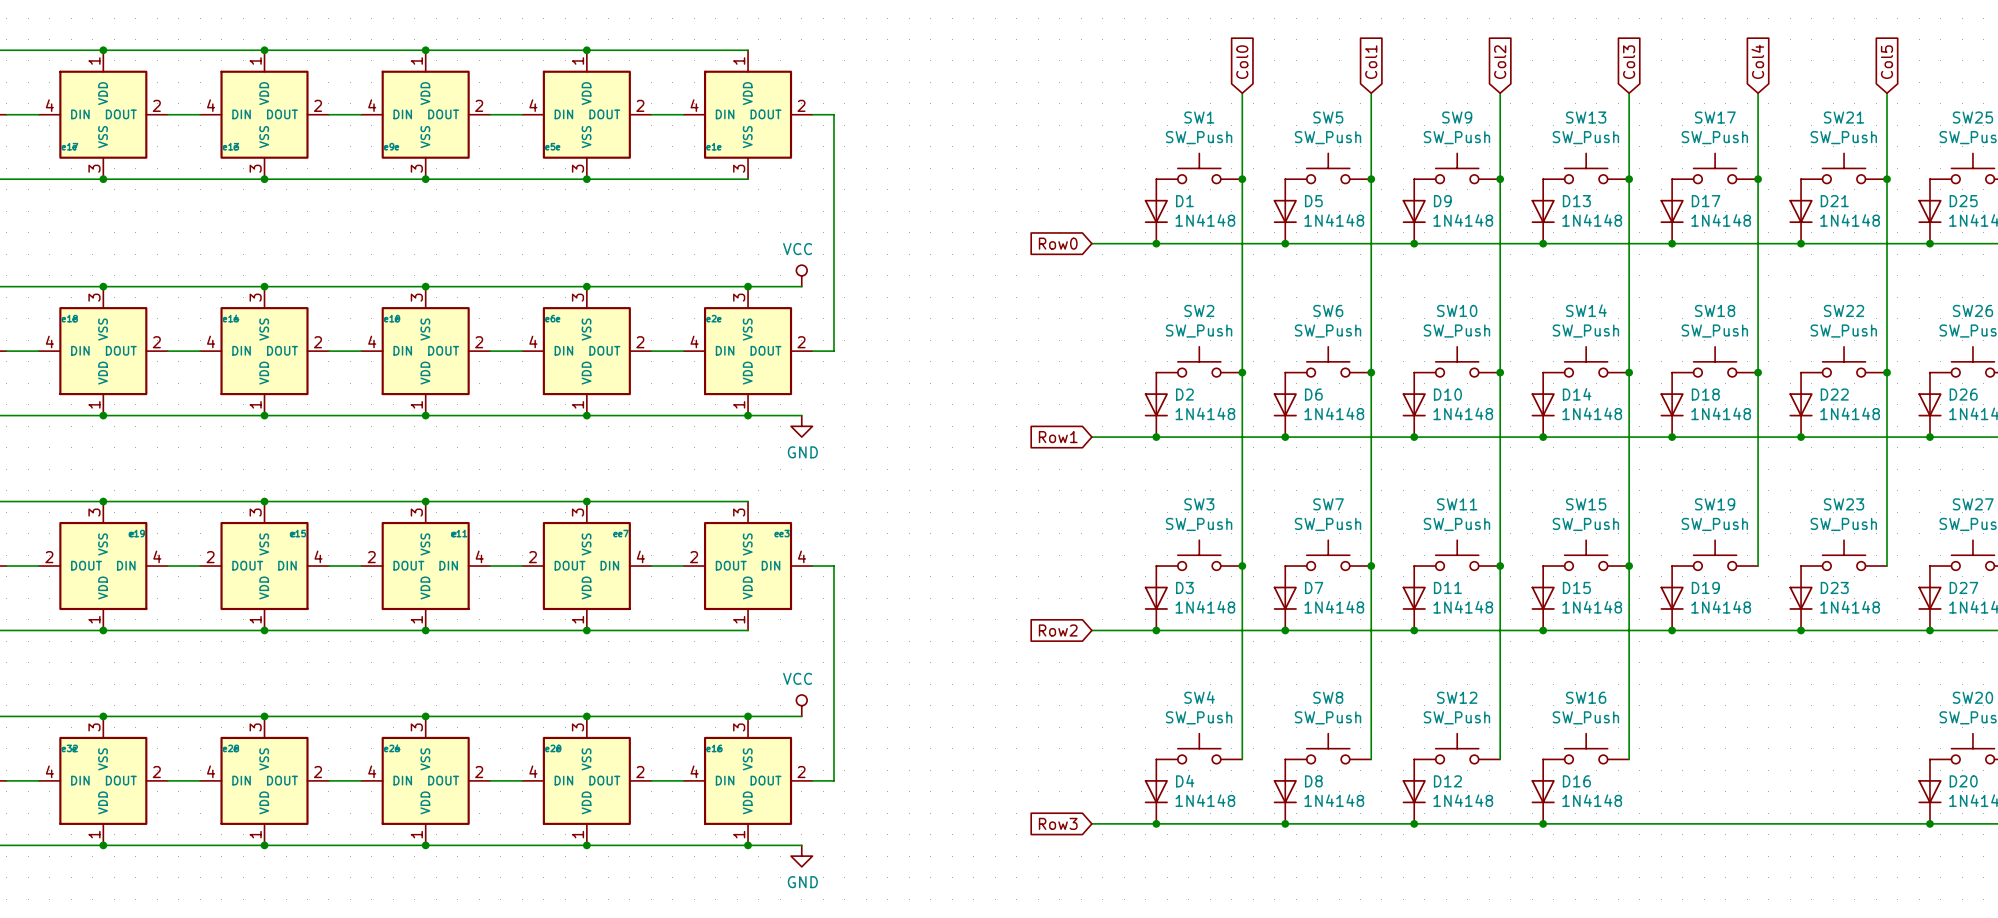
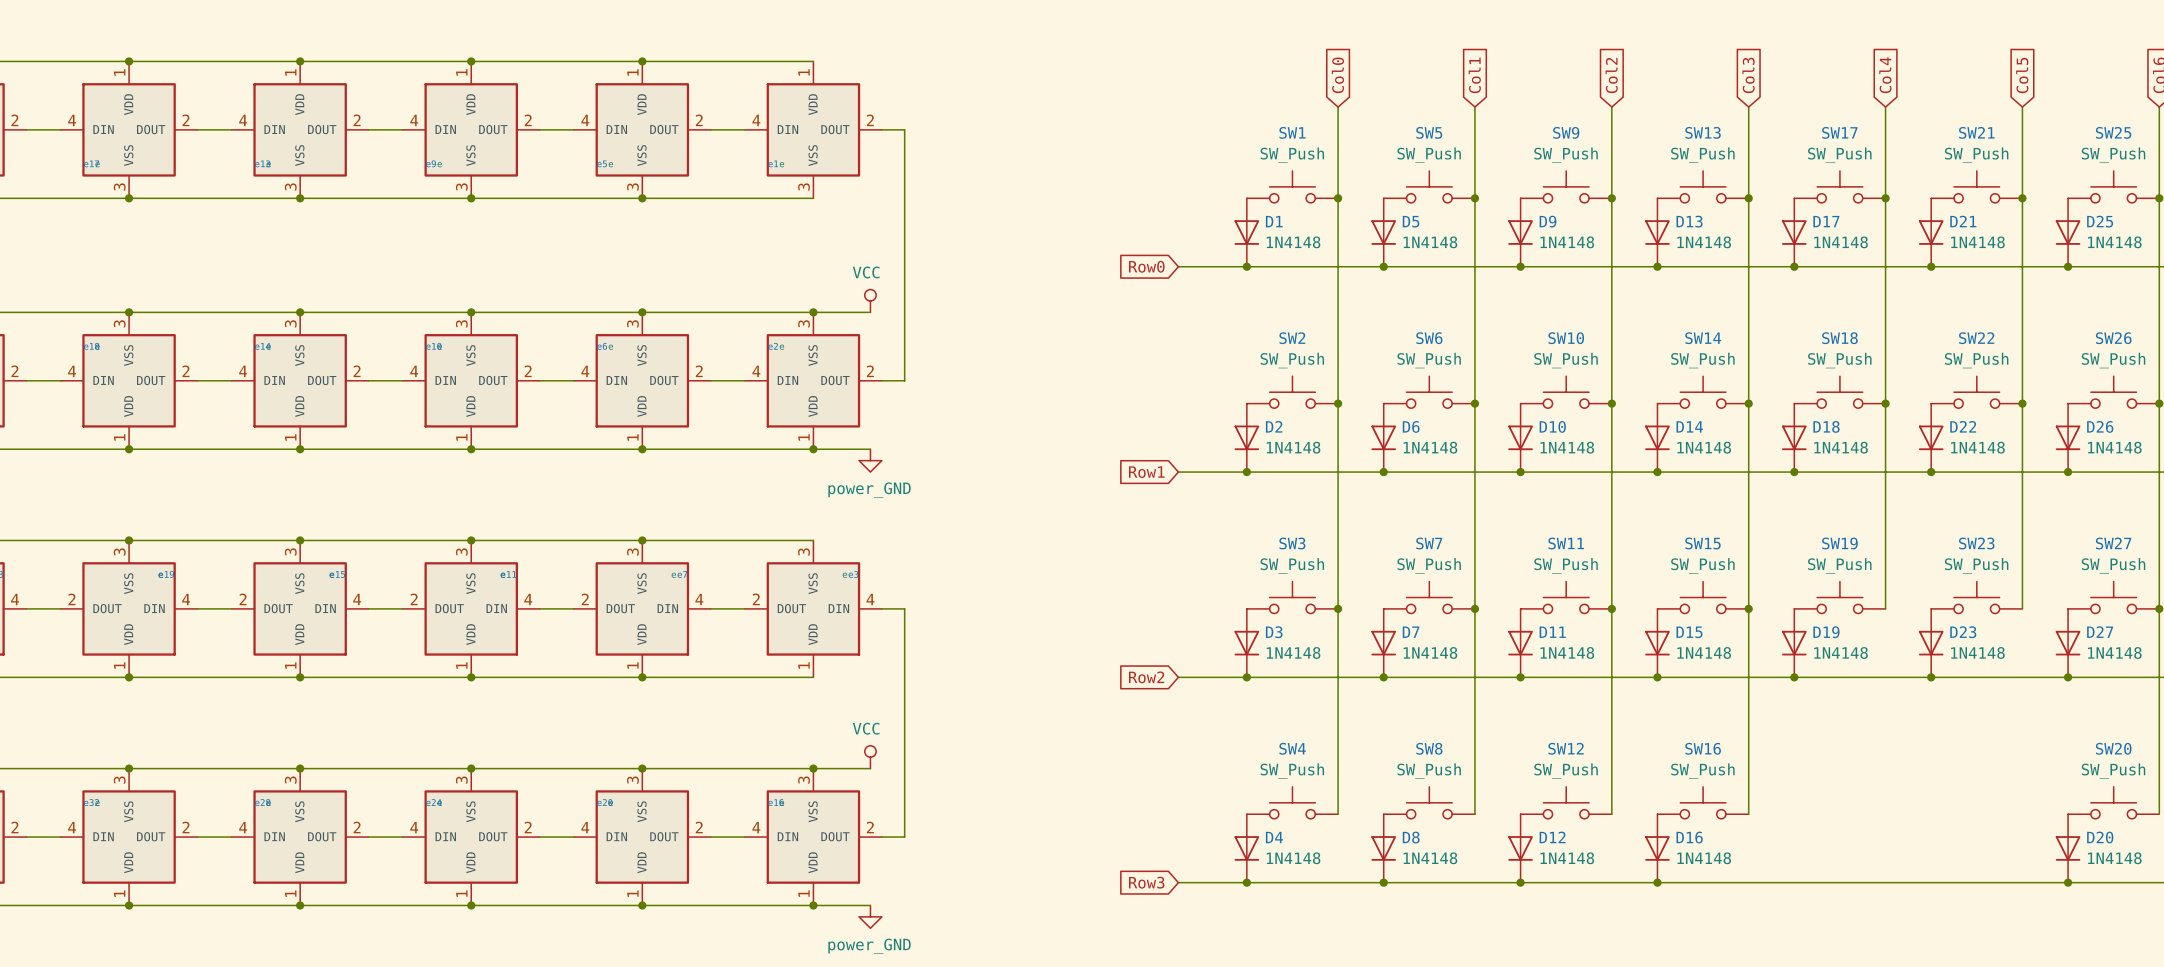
power symbol: GND (801, 426) -> power_GND (870, 460)
power symbol: GND (801, 856) -> power_GND (870, 916)

